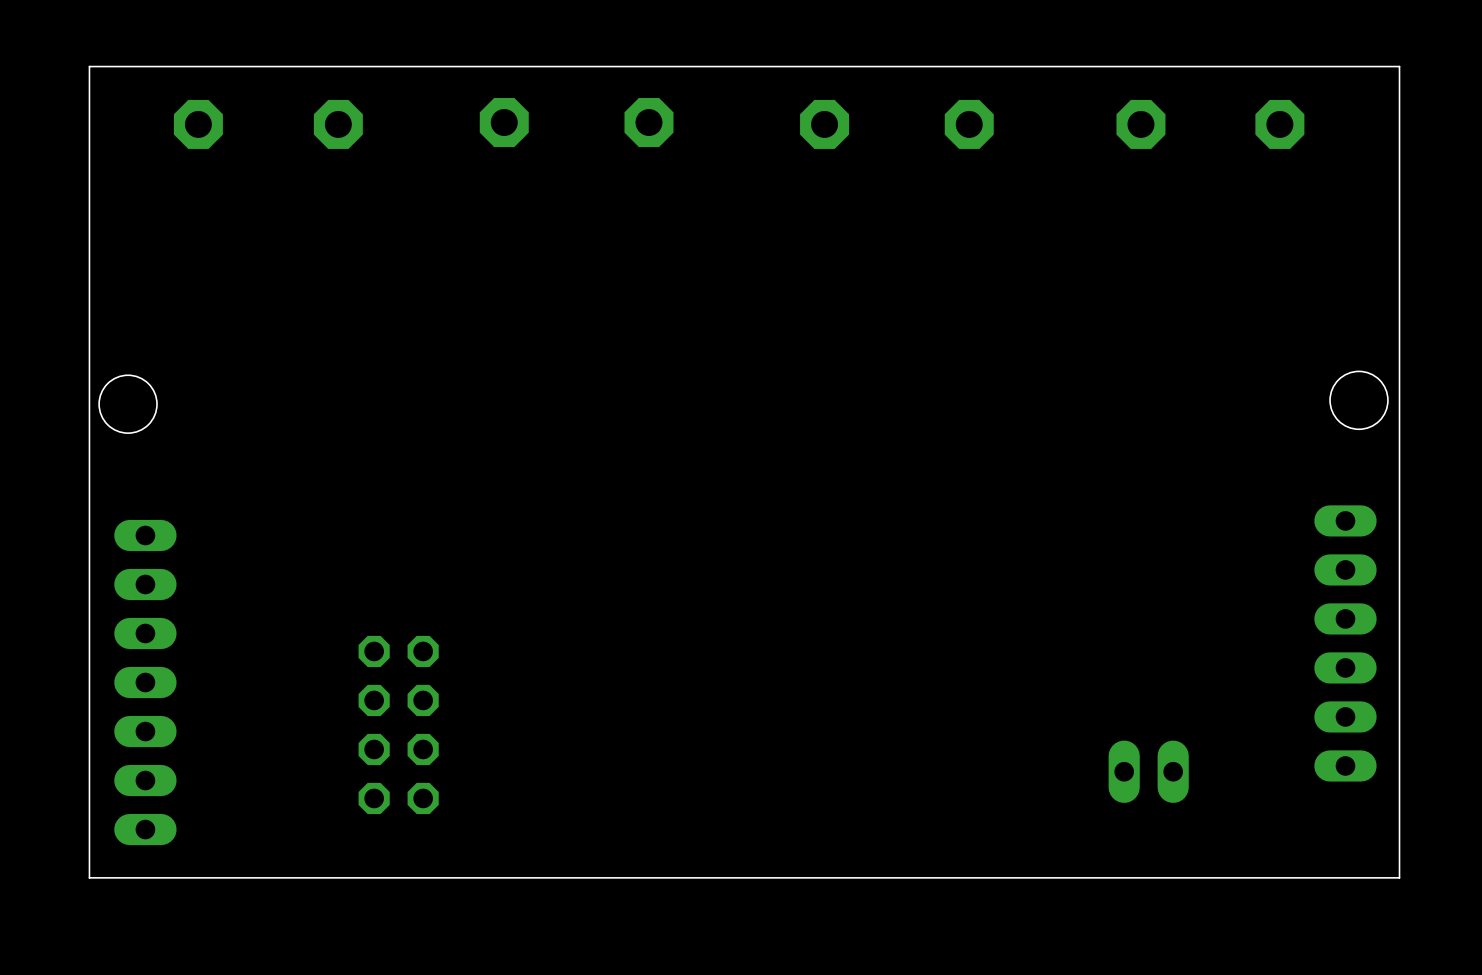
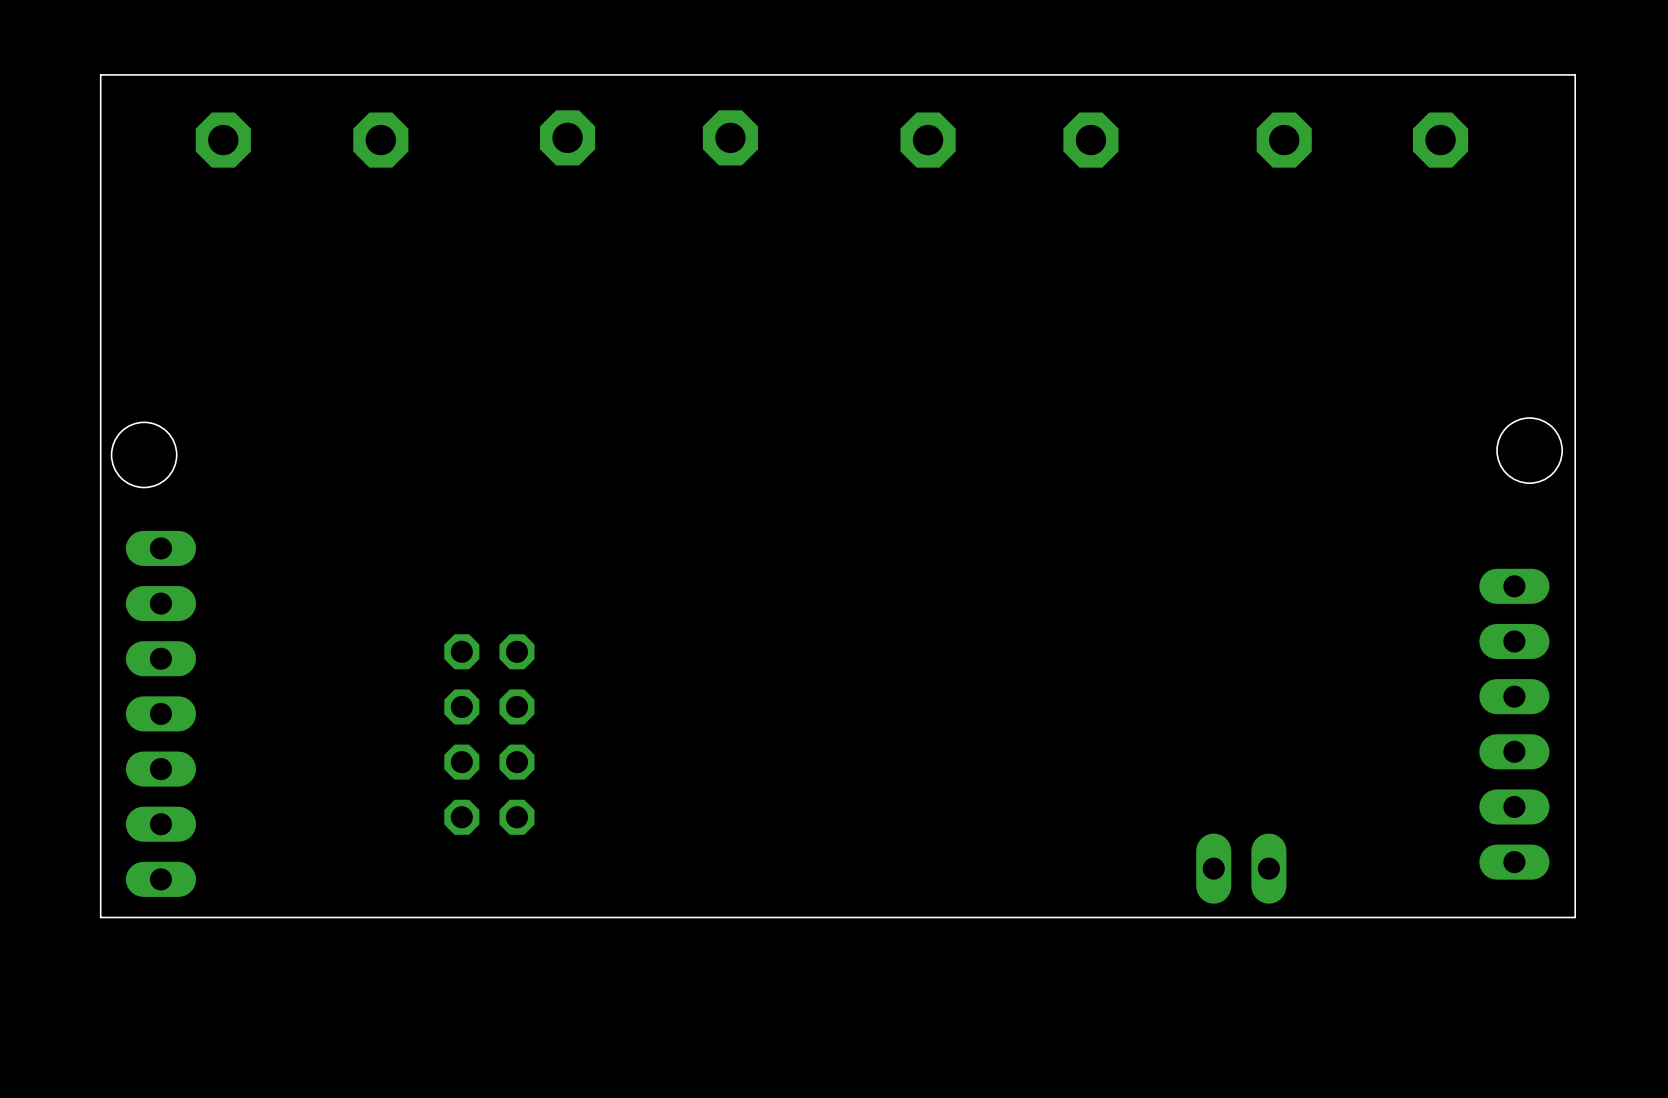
part position: (145, 682) -> (160, 713)
part position: (398, 724) -> (489, 734)
part position: (1148, 771) -> (1241, 868)
board edge: (1399, 815) (1399, 877) (89, 877) (89, 815) -> (1575, 917) (100, 917)

